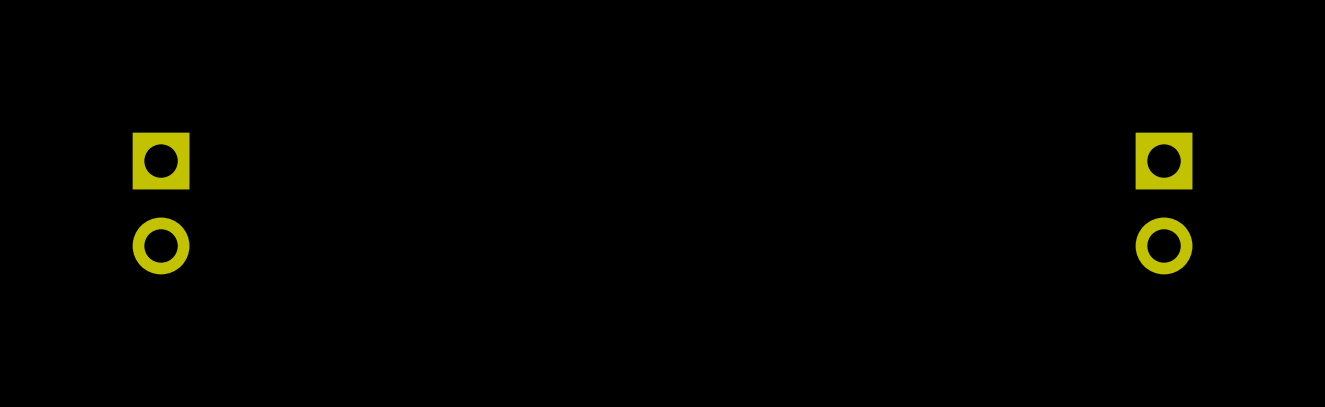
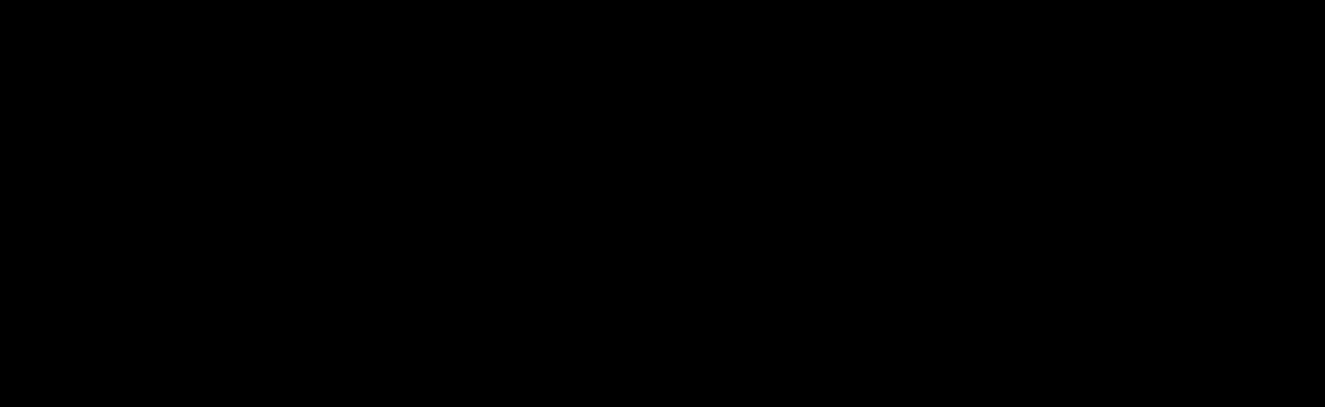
part: (161, 203) -> none
part: (1164, 203) -> none

